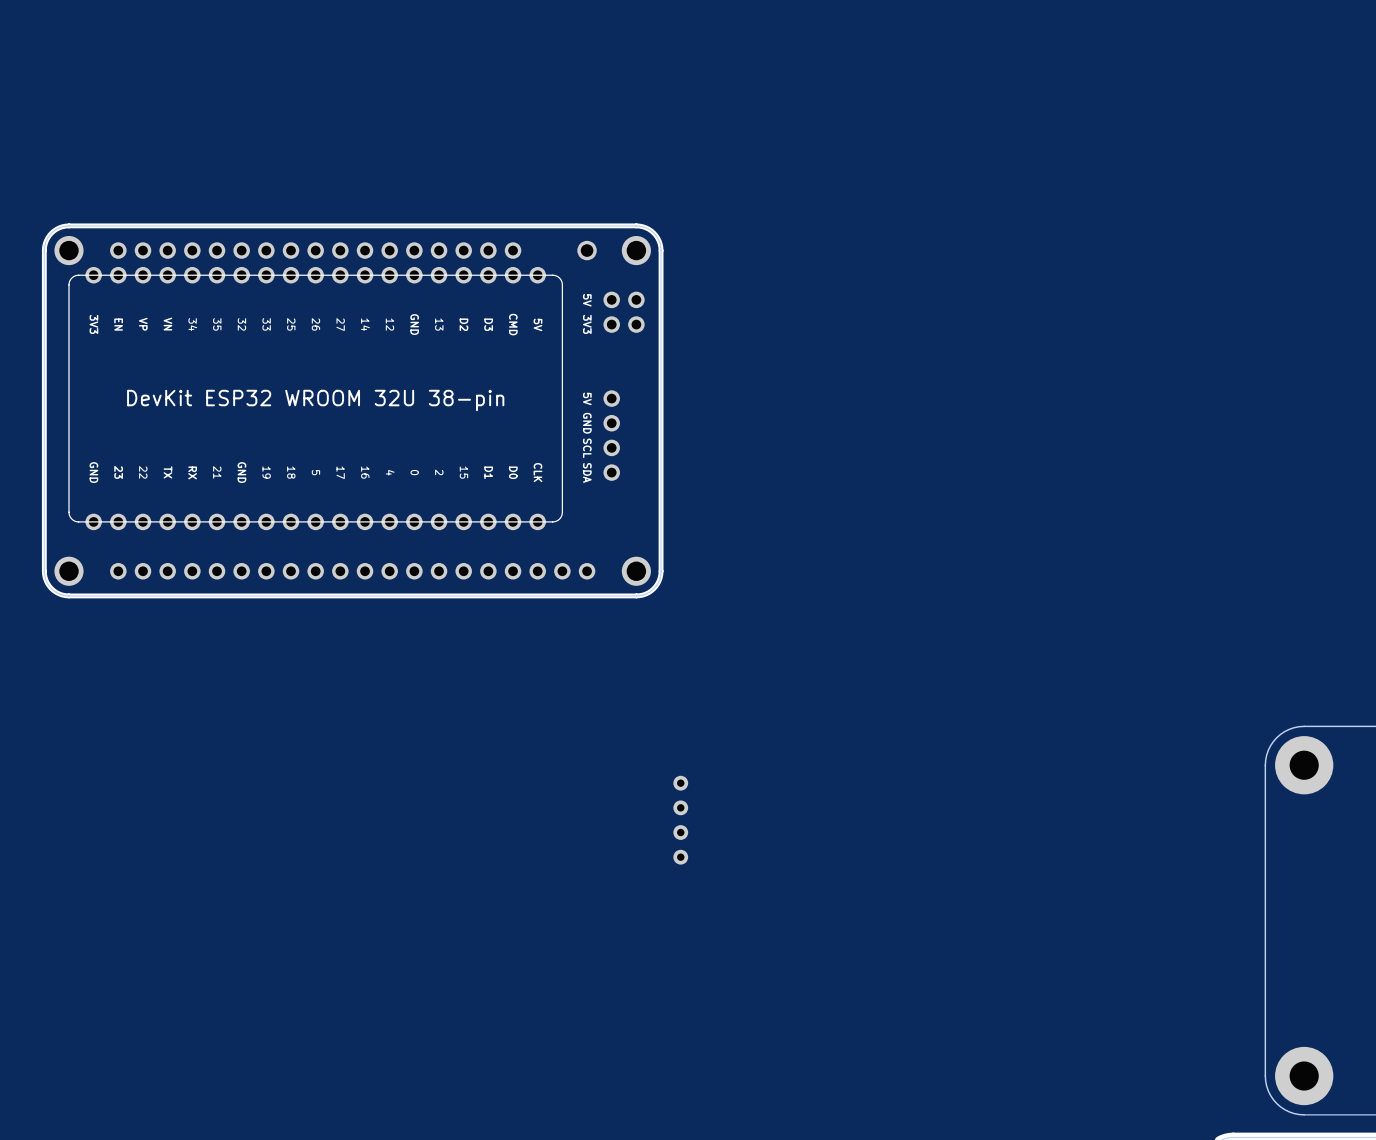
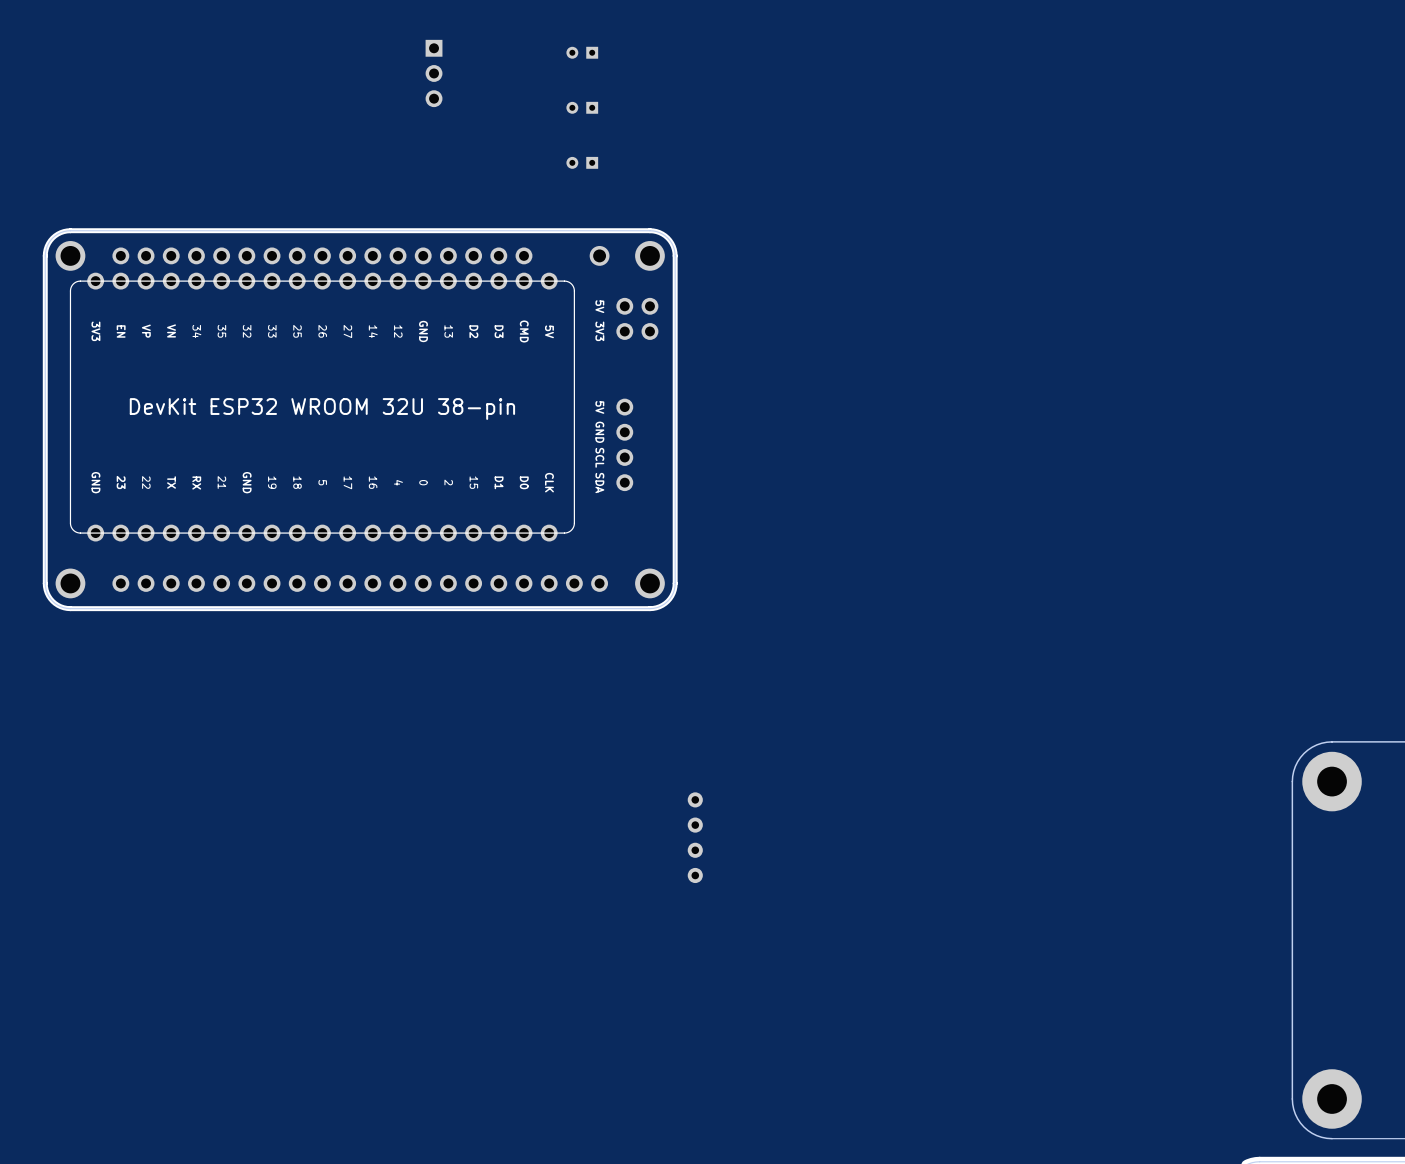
part: none -> (582, 52)
part: none -> (434, 73)
part: none -> (582, 107)
part: none -> (582, 162)

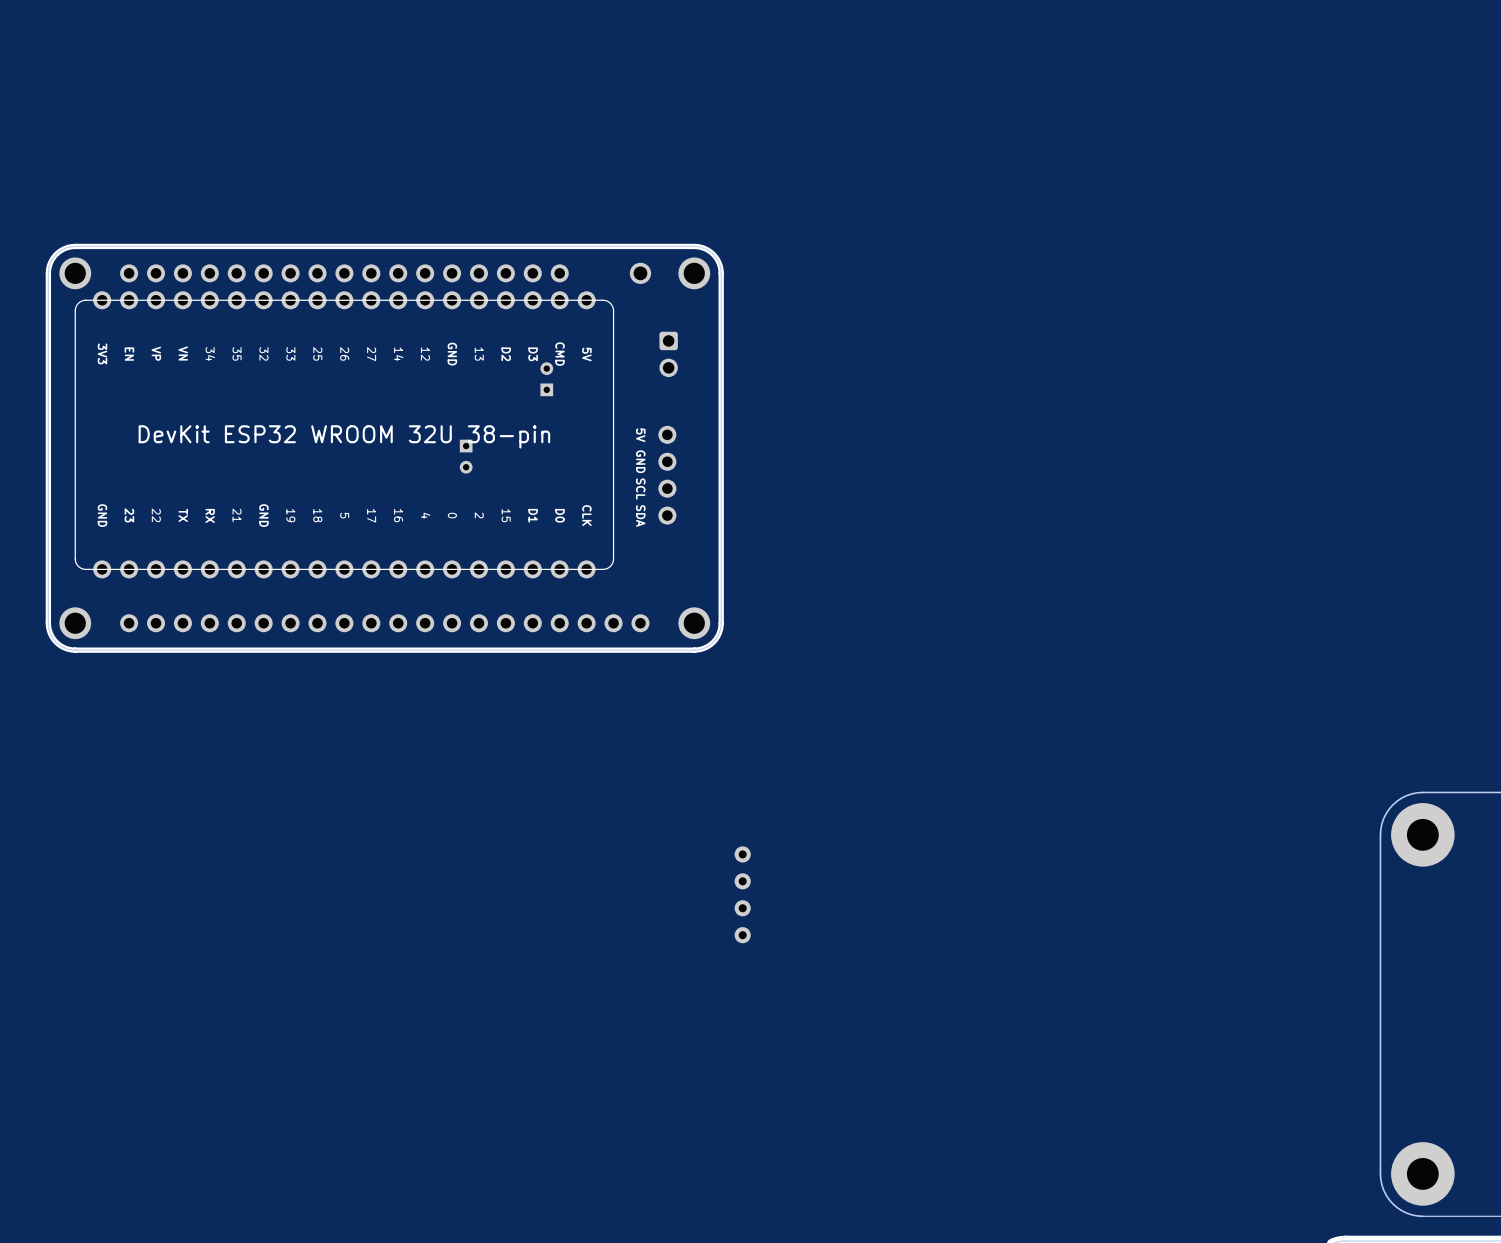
part: (582, 52) -> none
part: (434, 73) -> none
part: (582, 107) -> none
part: (582, 162) -> none
part footprint: [42, 228, 678, 612] -> [45, 243, 724, 653]
part: none -> (668, 354)
part: none -> (546, 379)
part: none -> (466, 456)

